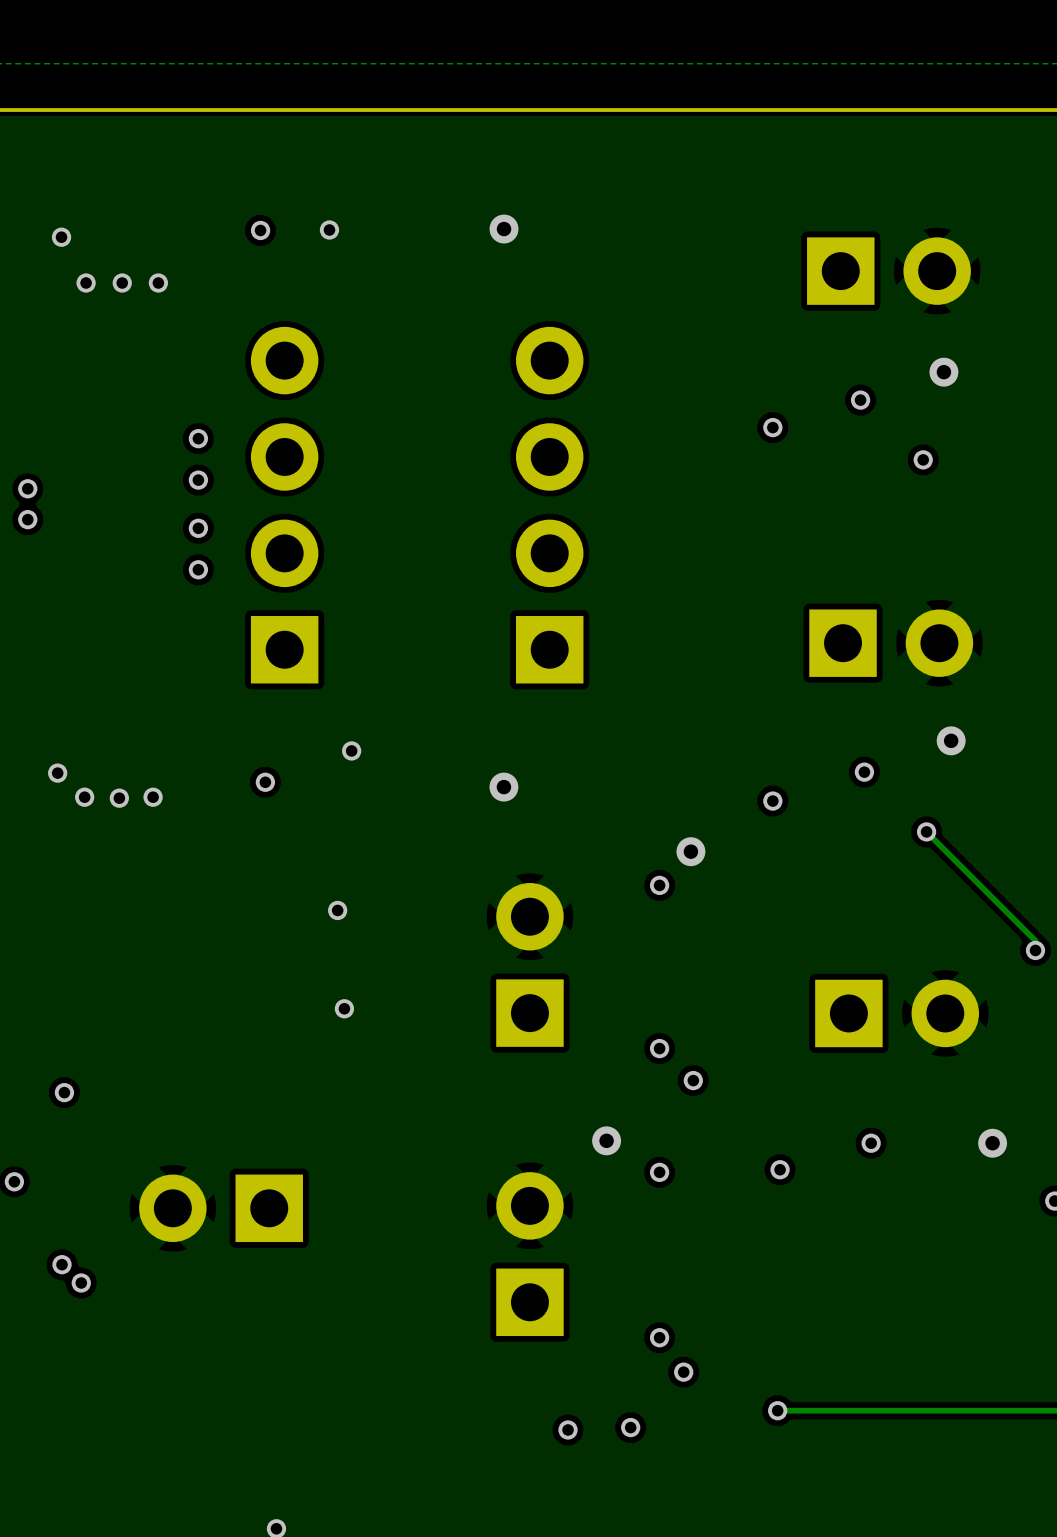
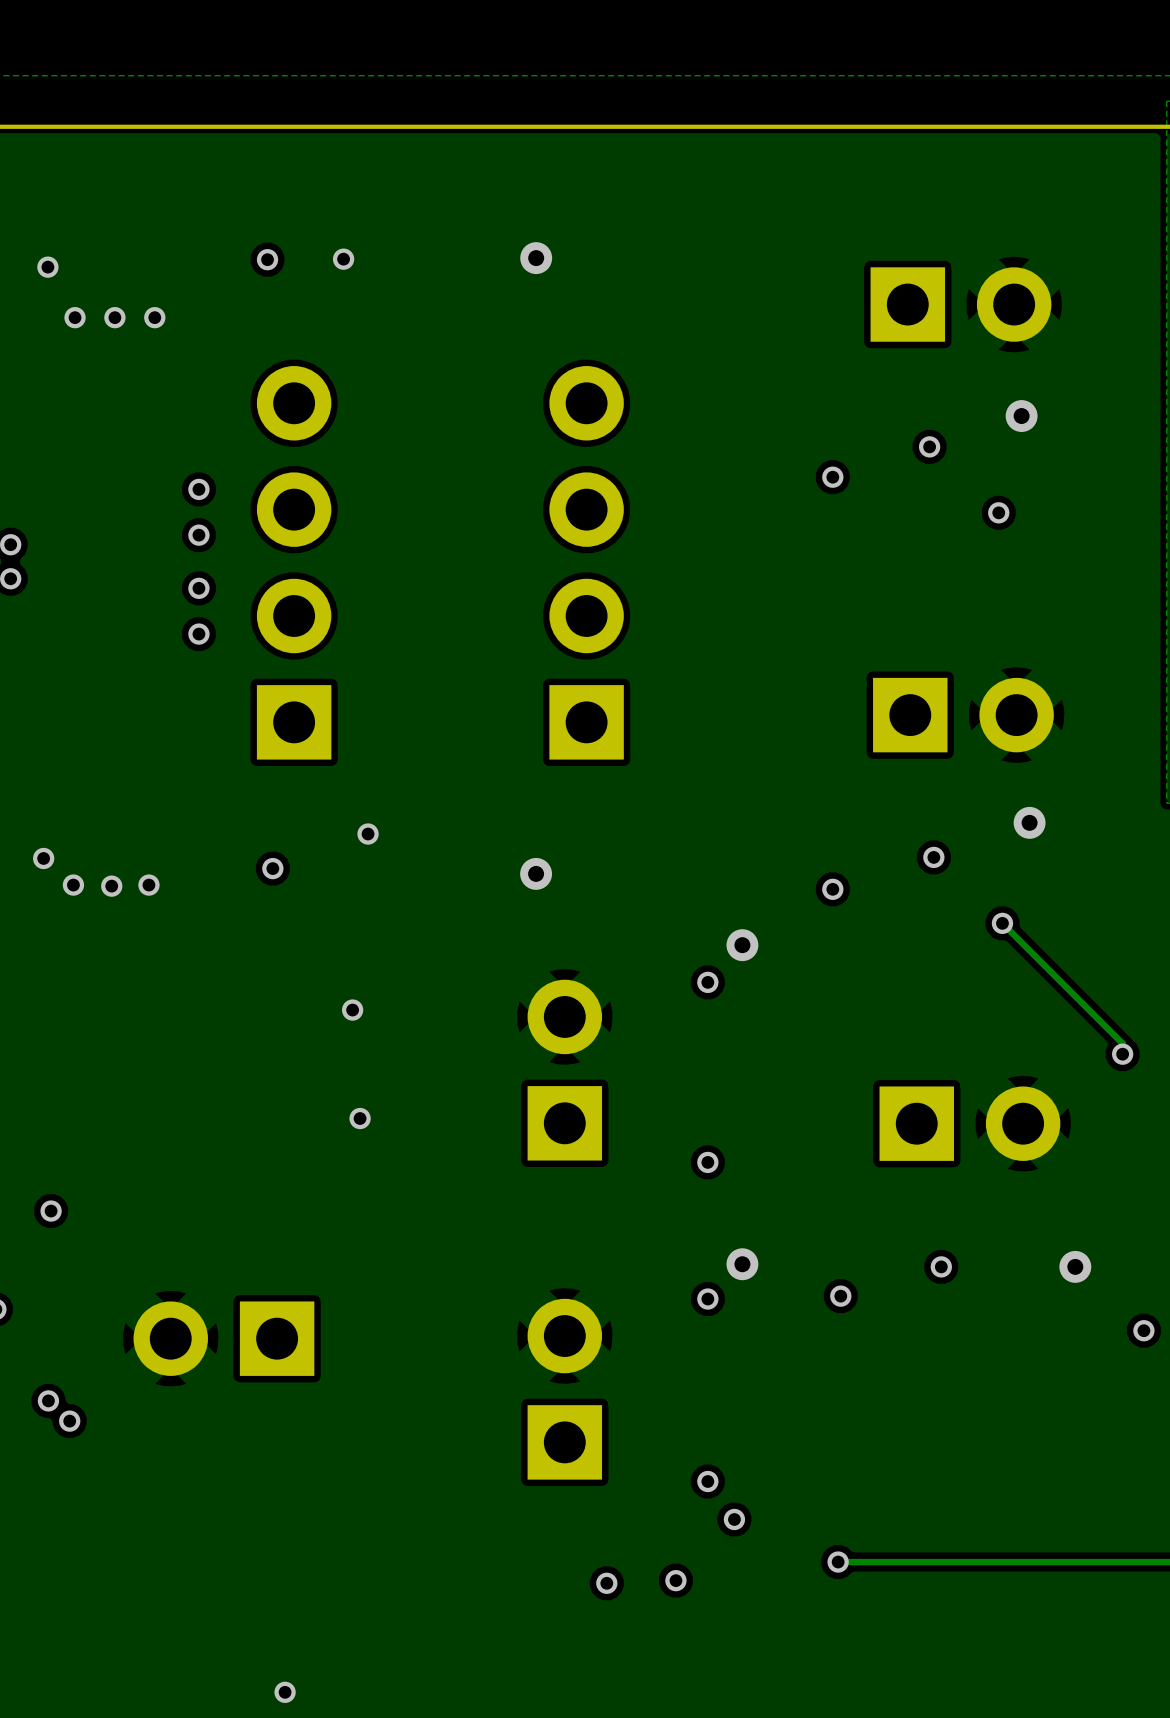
via: (693, 1080) -> none
via position: (606, 1140) -> (742, 1264)

